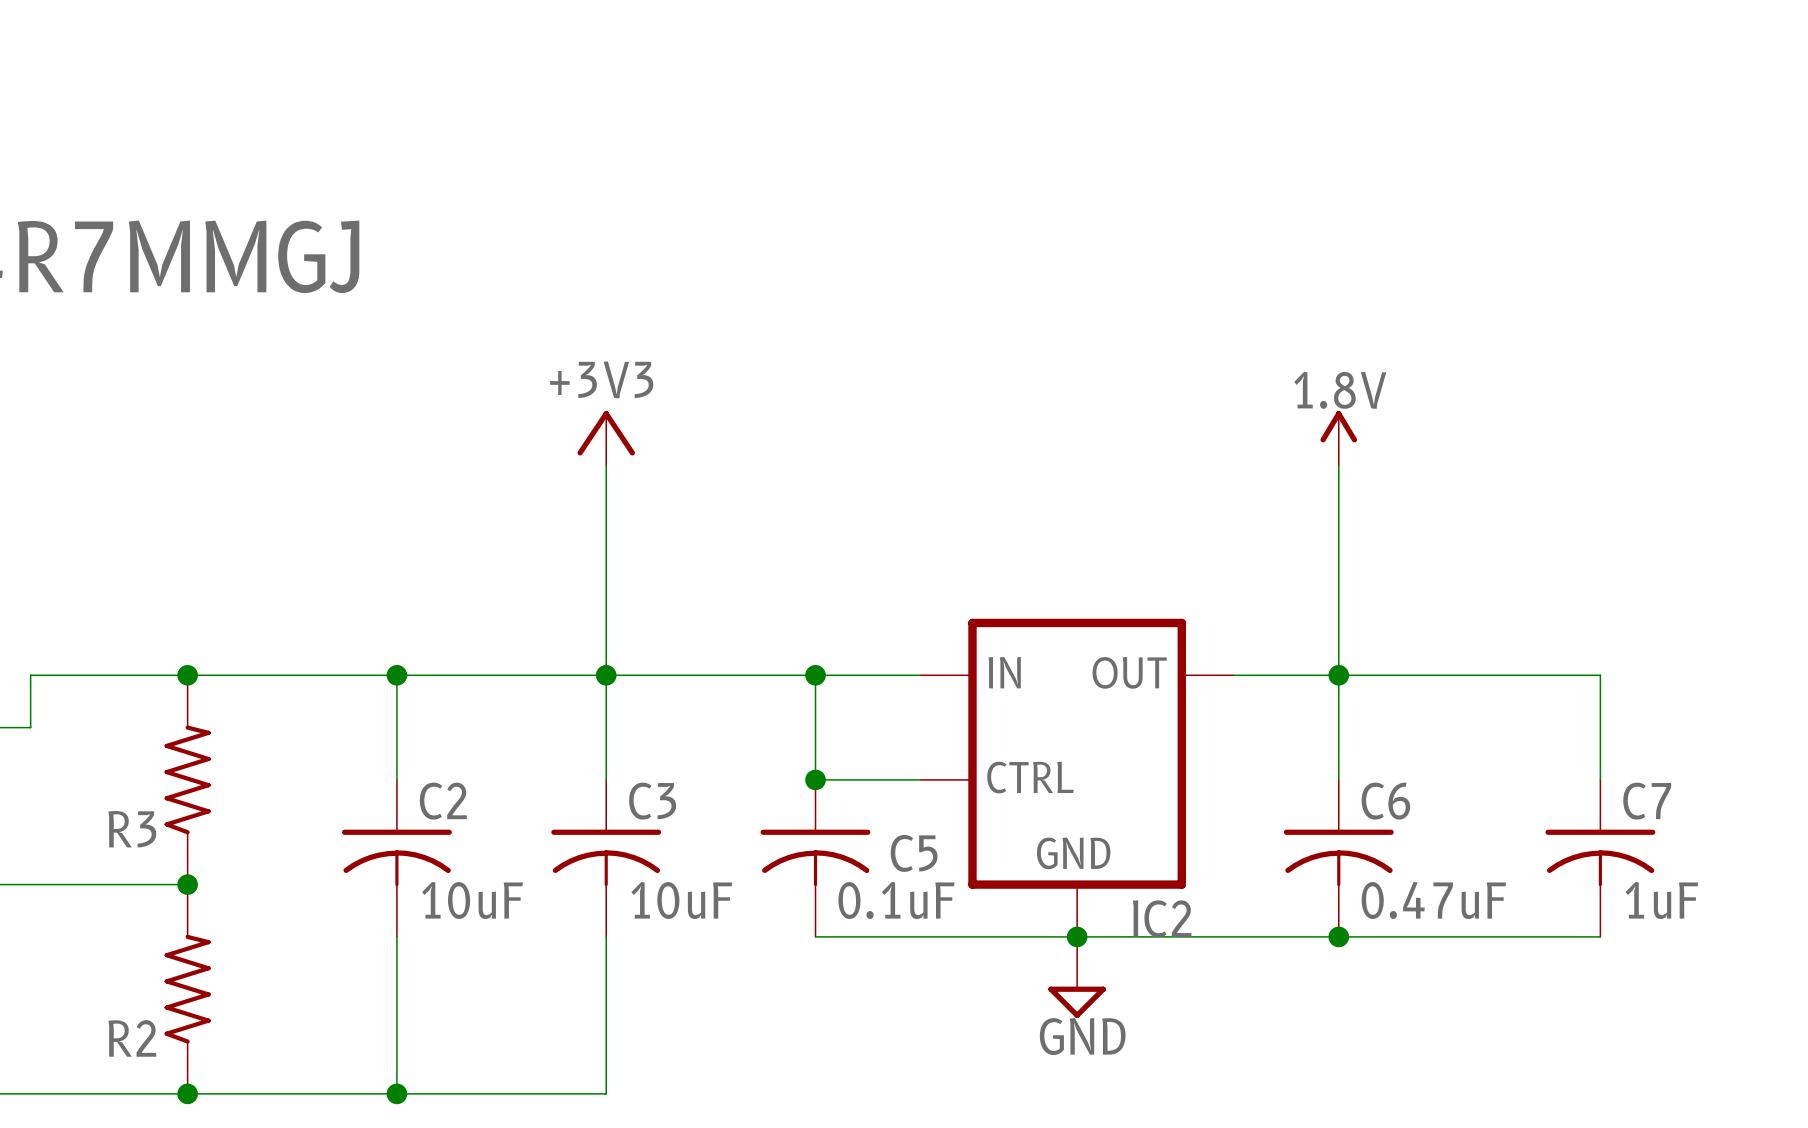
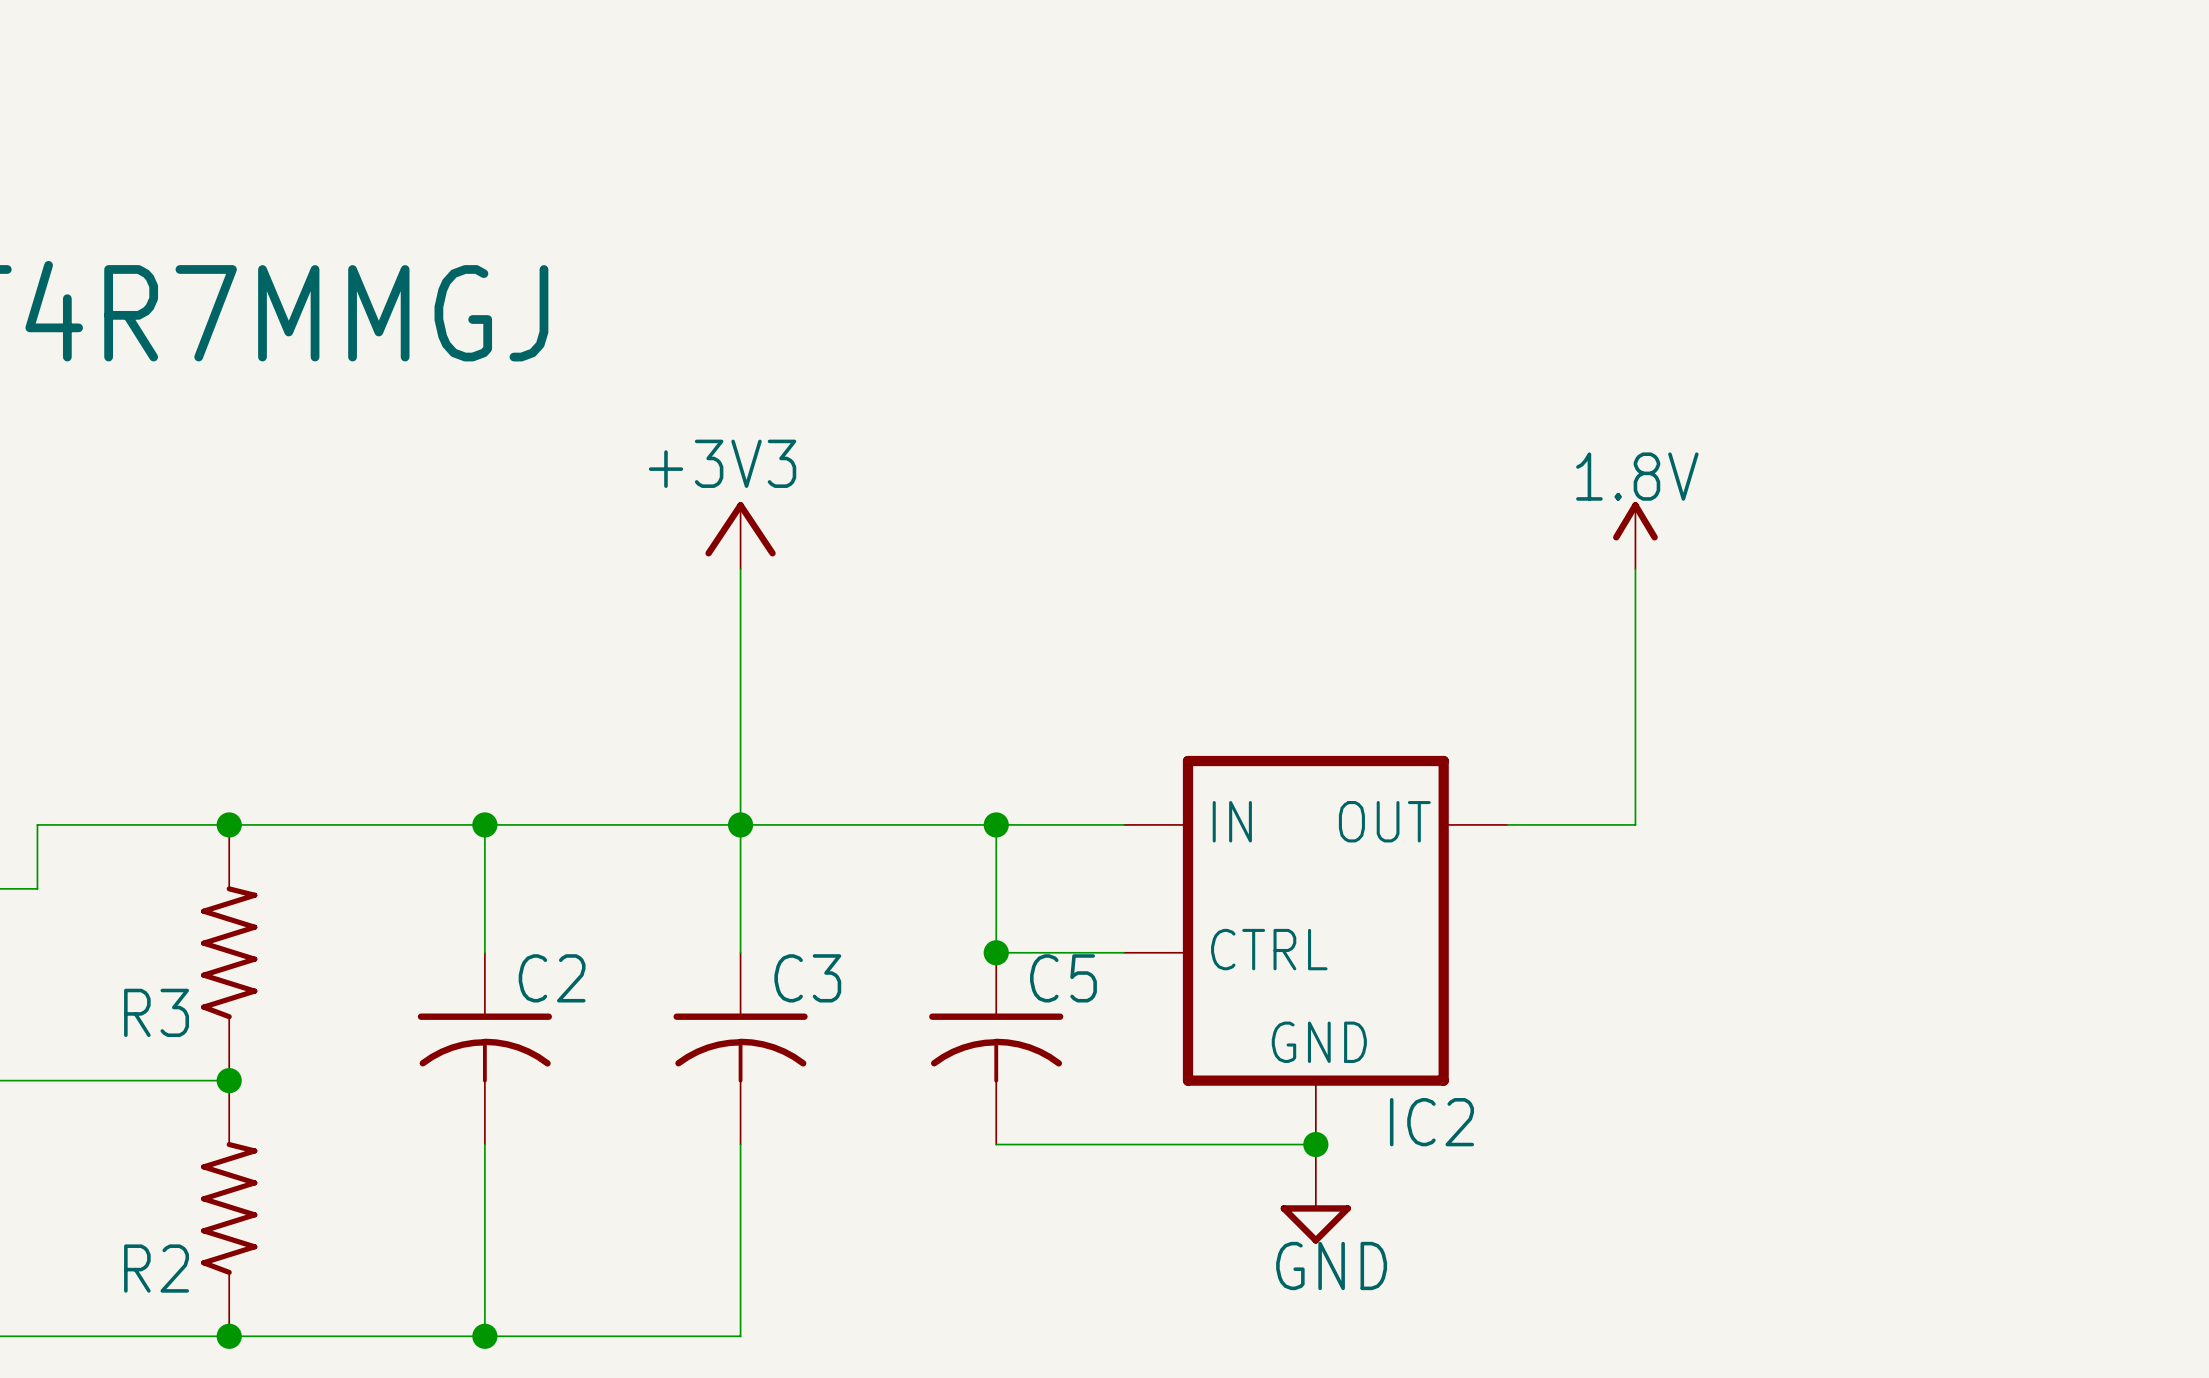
junction: (1338, 675) -> none
wire: (1338, 779) (1338, 675) (1600, 675) (1600, 779) -> none
C5 name position: C5 (914, 853) -> C5 (1063, 978)
C6: 0.47uF (1338, 858) -> none
C7: 1uF (1600, 858) -> none
C2 value: 10uF (472, 900) -> none
C3 value: 10uF (681, 900) -> none
C5 value: 0.1uF (896, 900) -> none
wire: (1077, 936) (1600, 936) -> none
junction: (1338, 936) -> none

